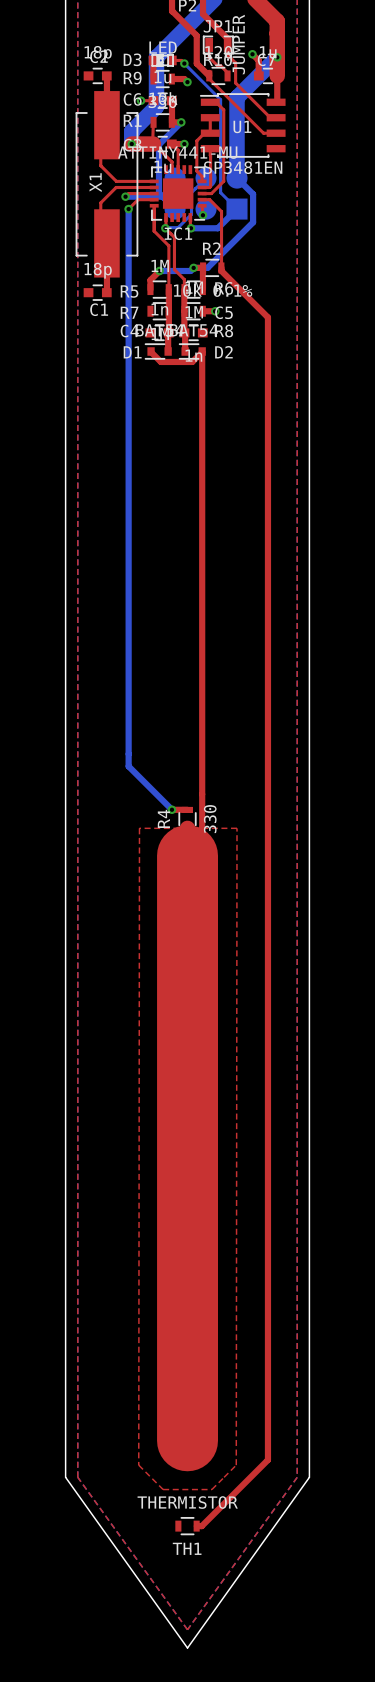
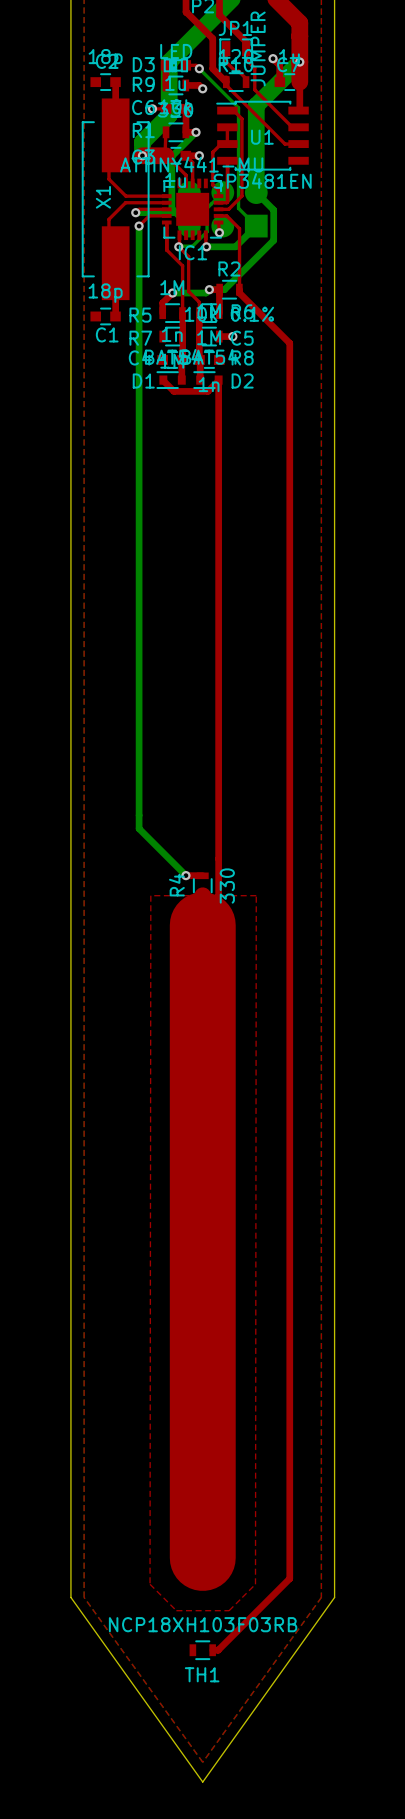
TH1 value: THERMISTOR (187, 1502) -> NCP18XH103F03RB (203, 1624)

